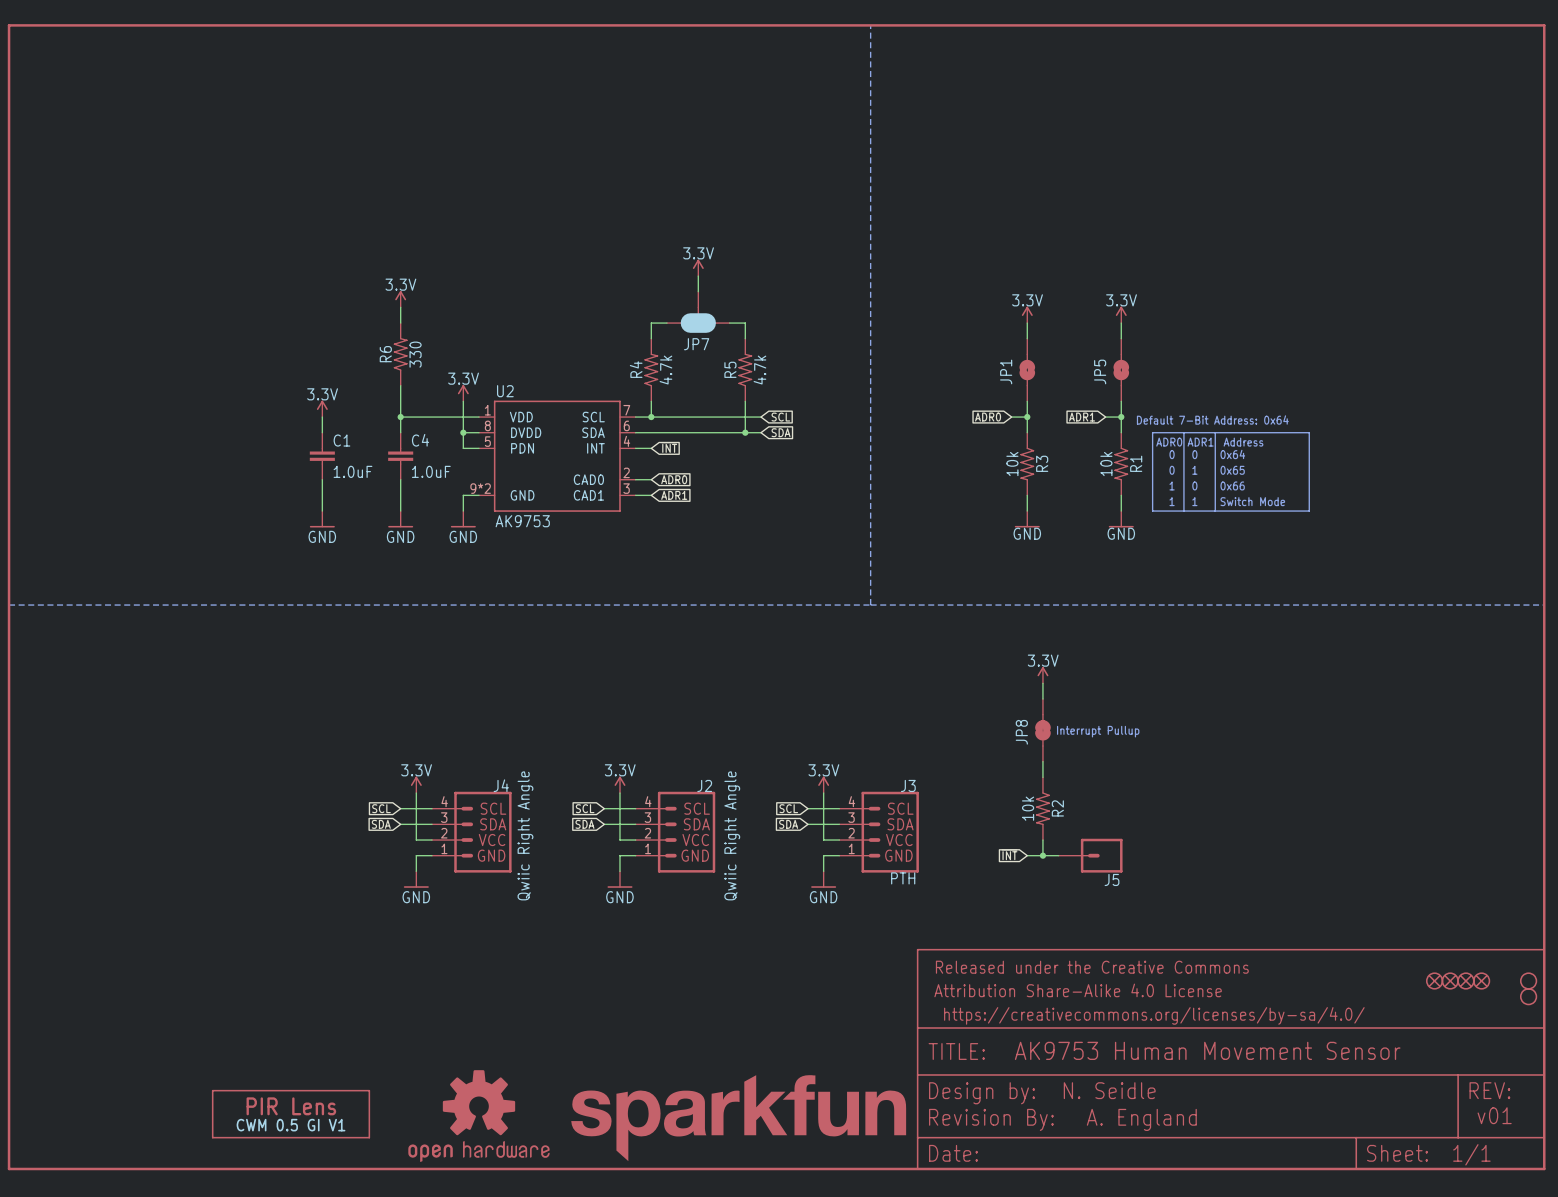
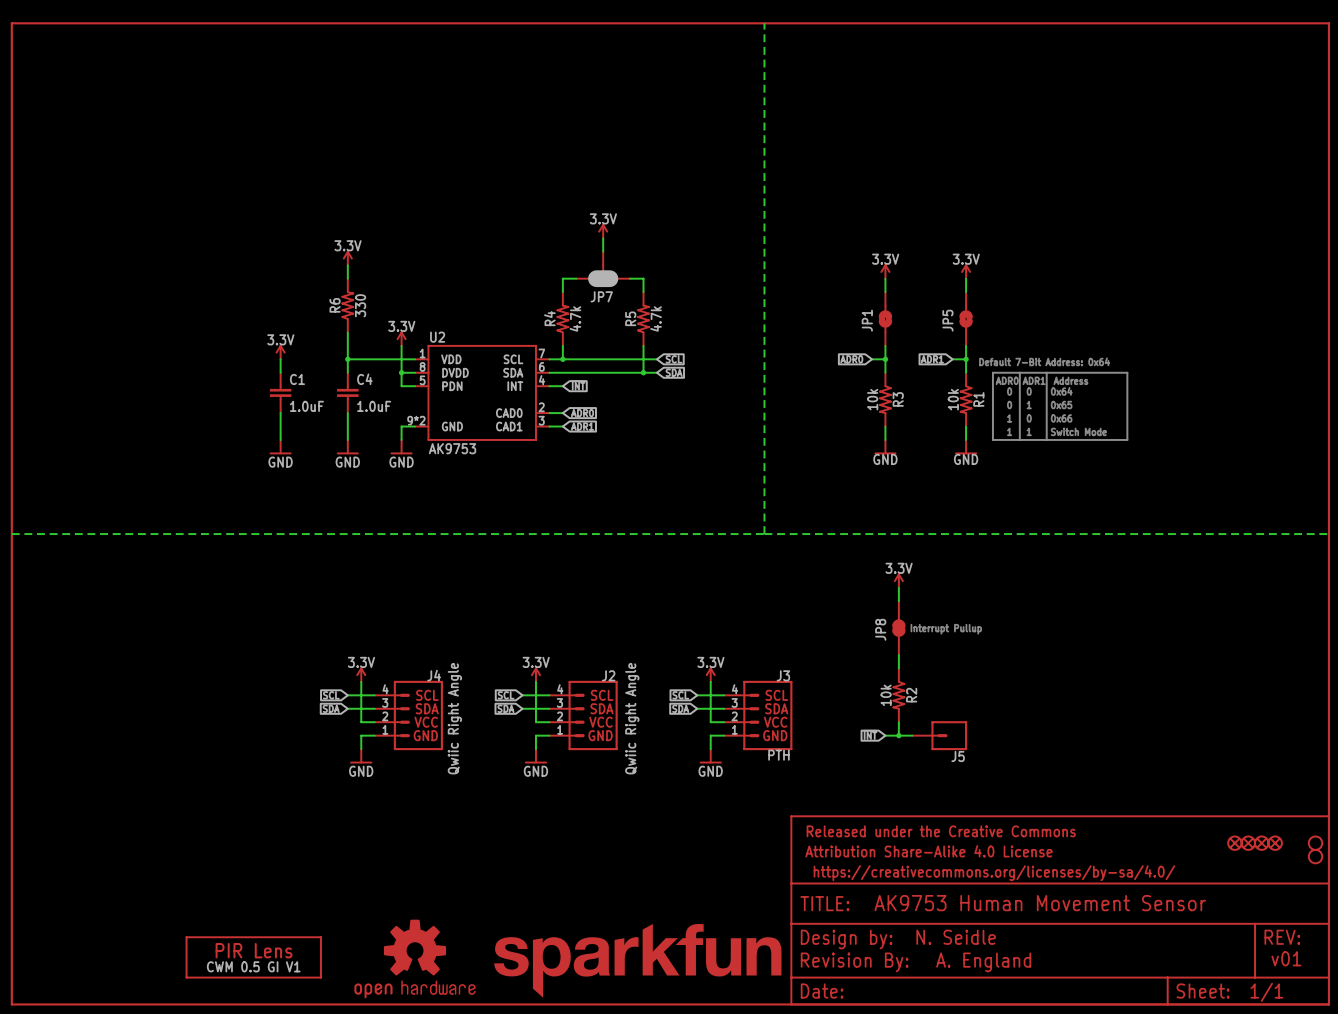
line: (870, 25) (870, 605) -> none
wire: none -> (764, 23) (764, 534)
line: (9, 605) (1544, 605) -> none
wire: none -> (11, 534) (1328, 534)

